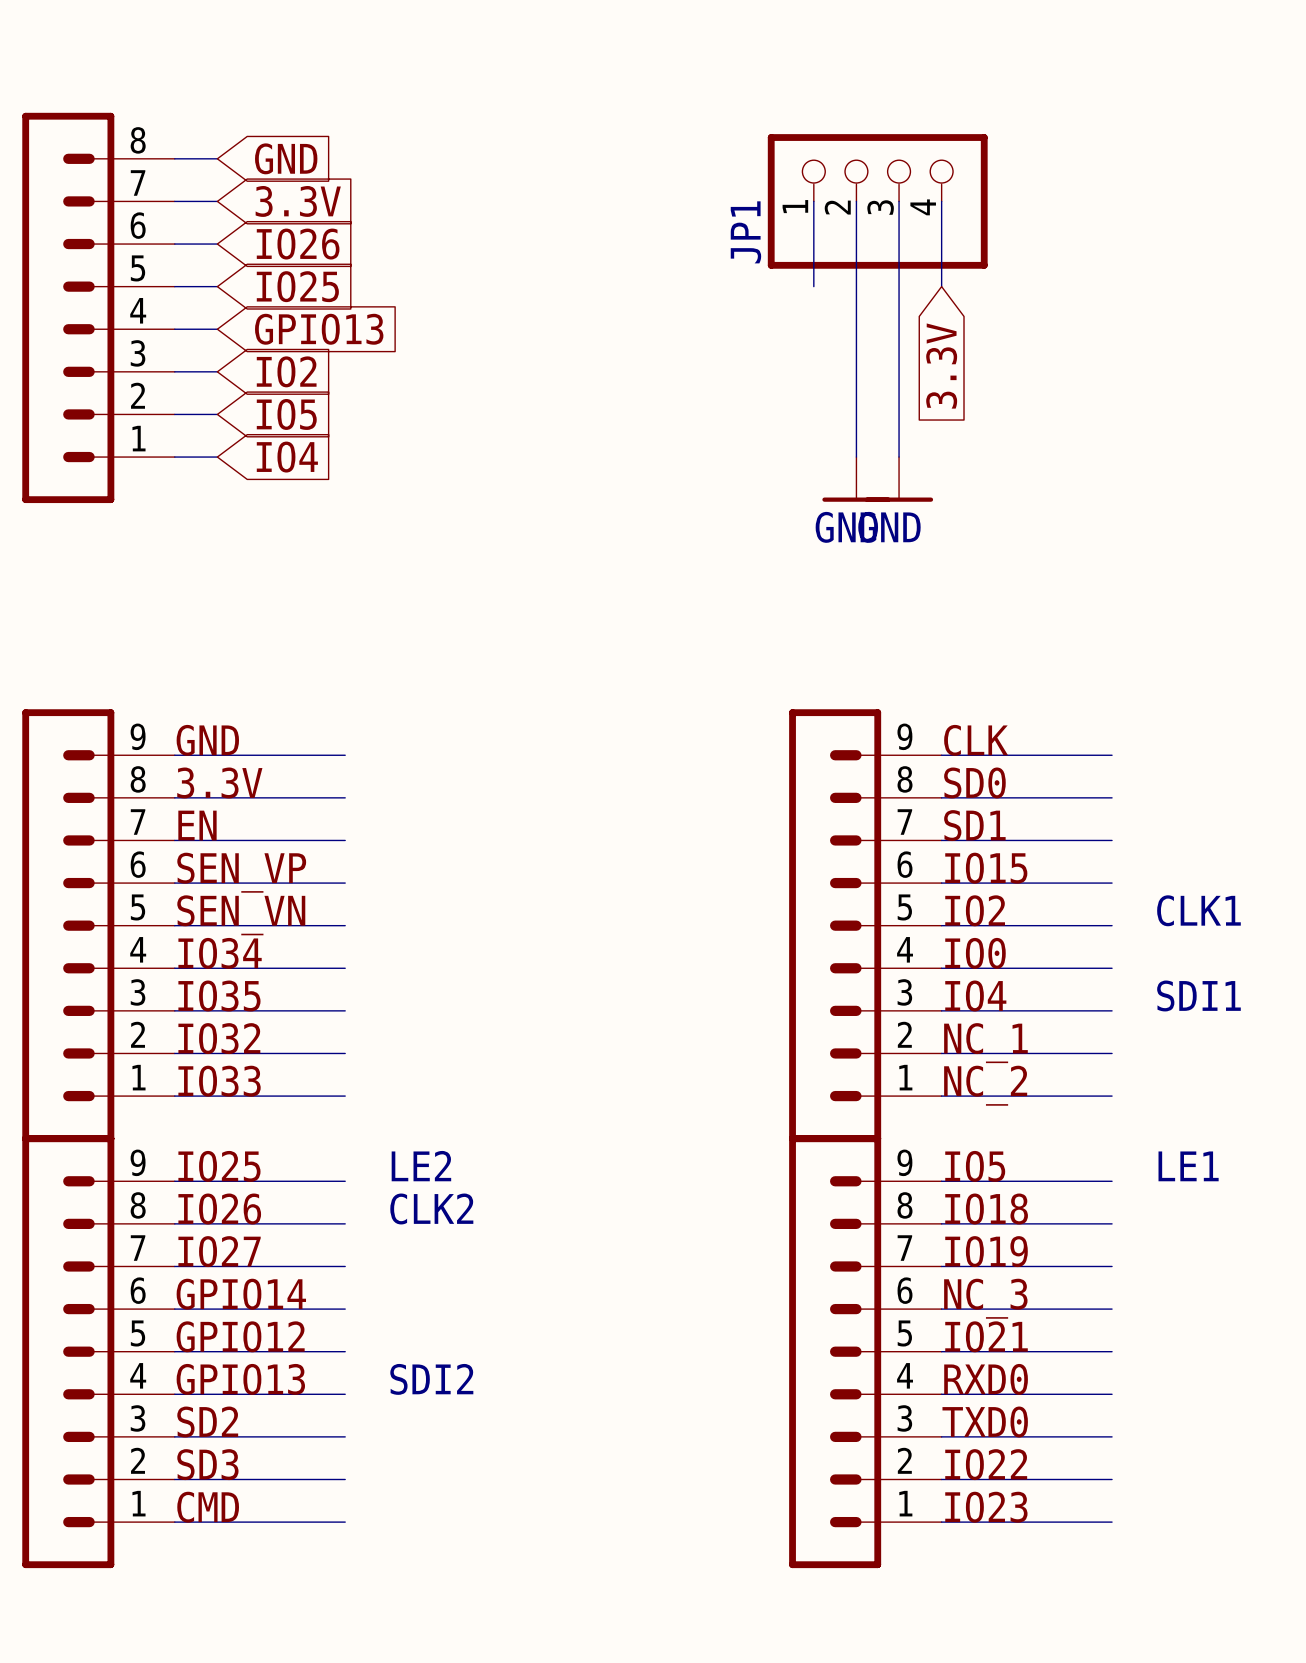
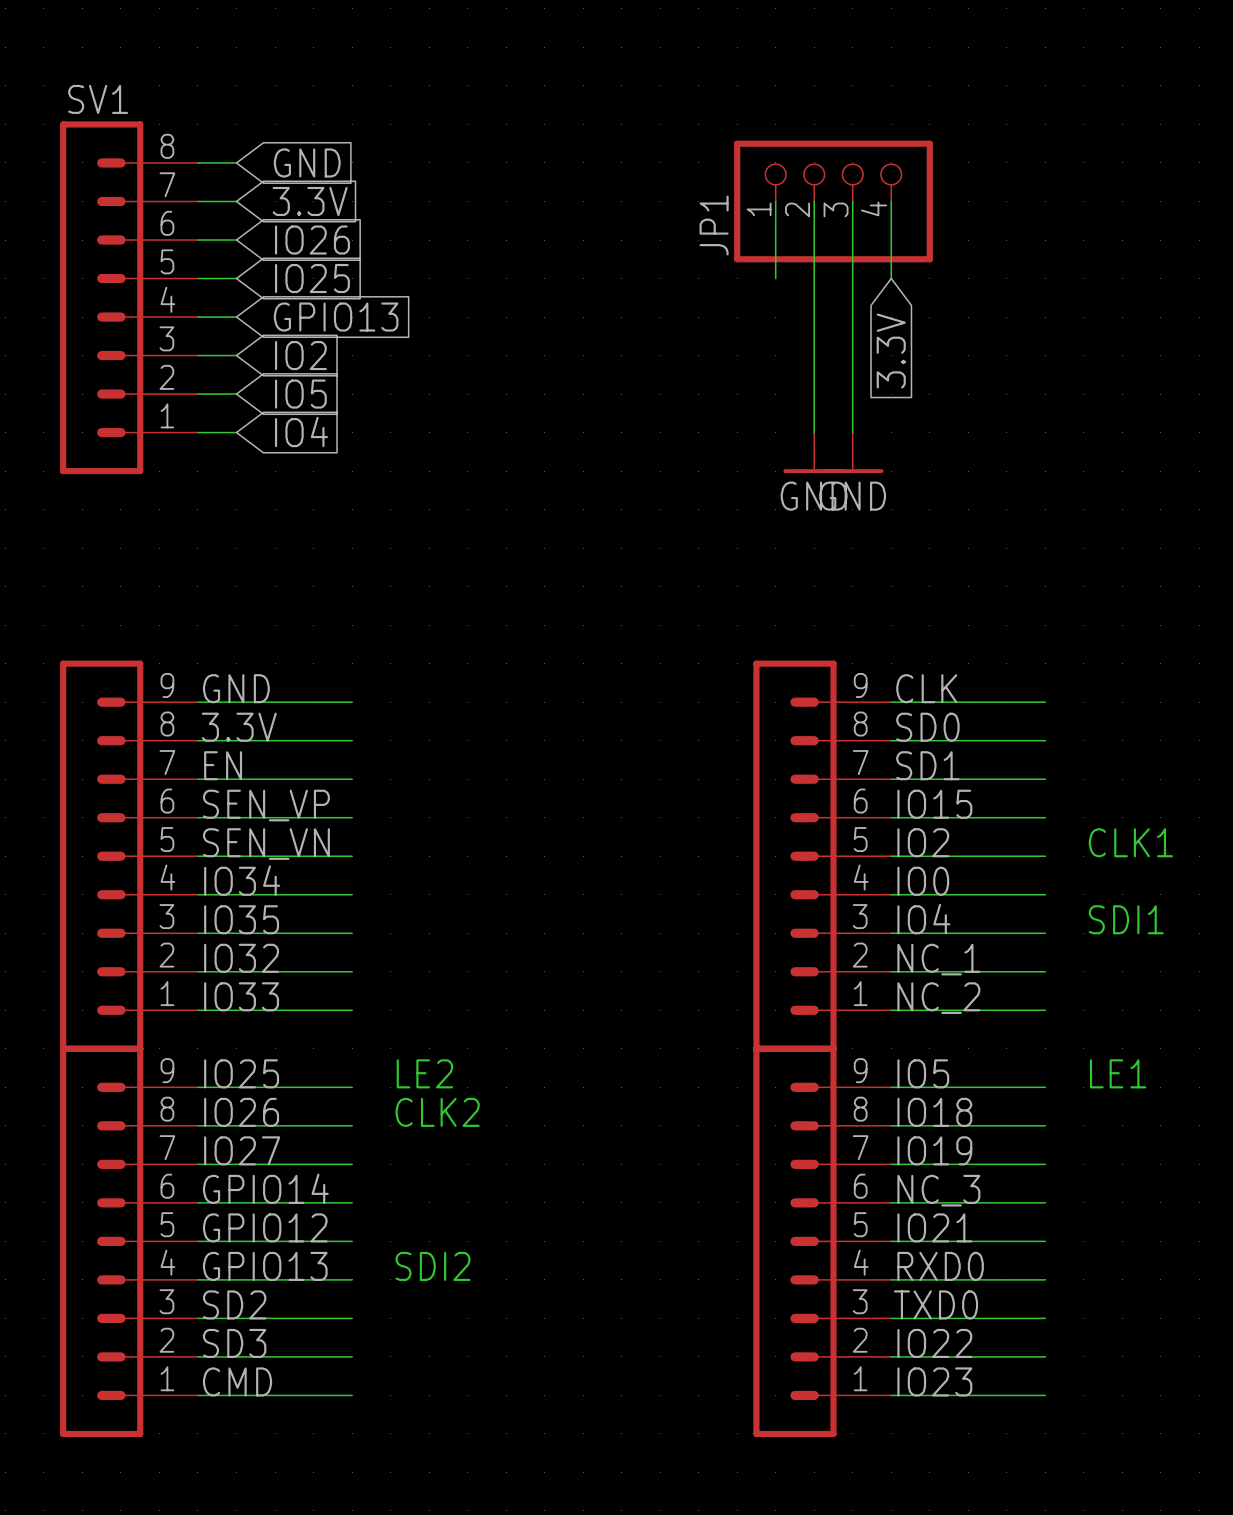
SV1 name: none -> SV1 (98, 99)

